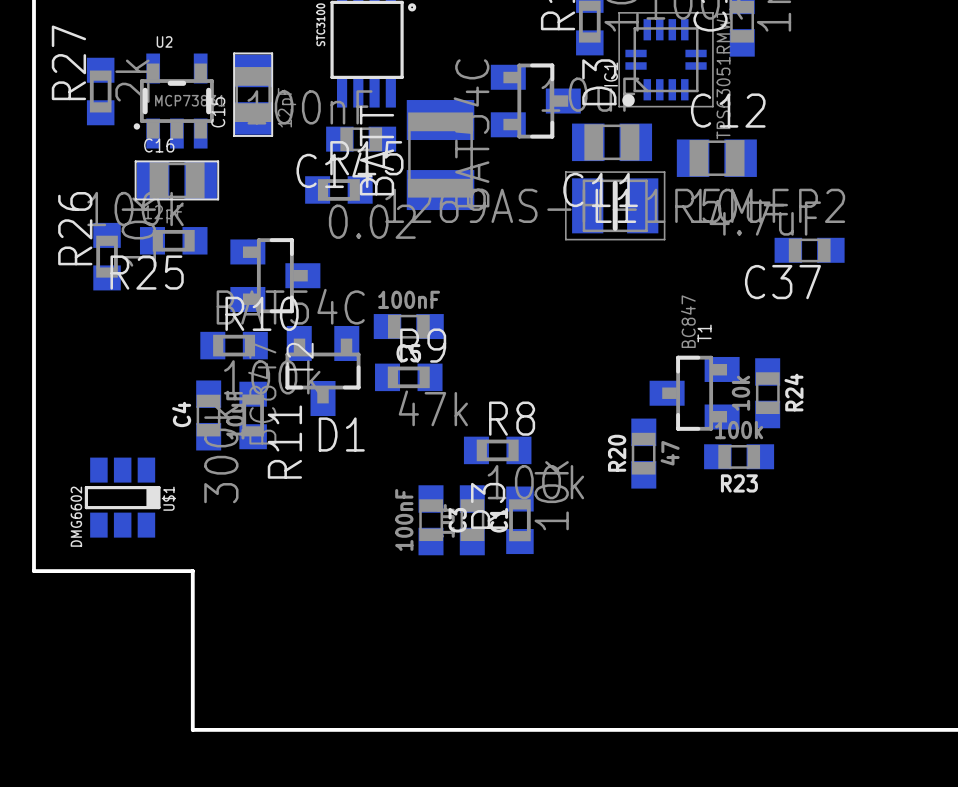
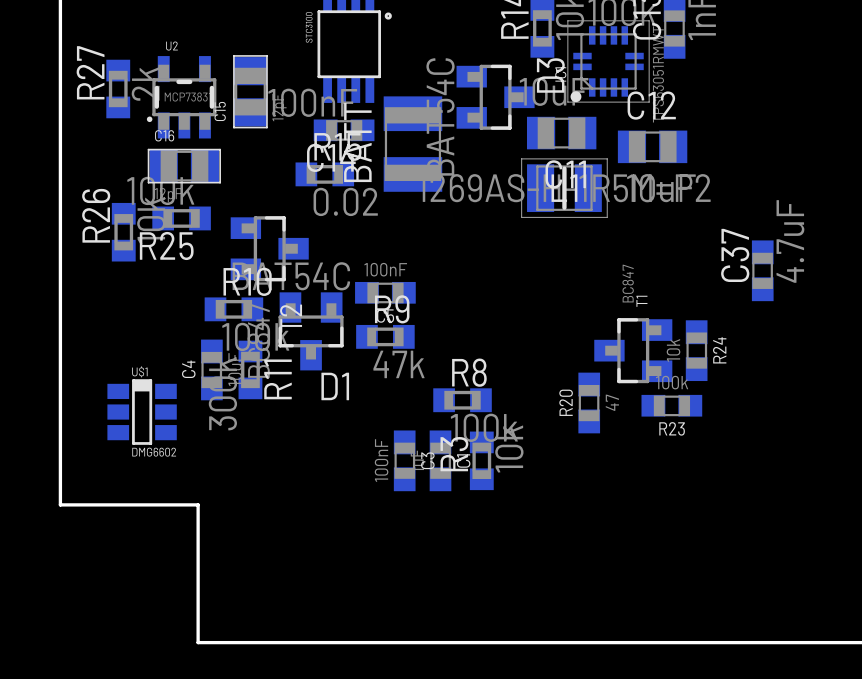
C37 rotation: 0° (809, 250) -> 90° clockwise (762, 270)
C37 position: (809, 250) -> (762, 270)
U$1 rotation: 0° (122, 497) -> 90° counterclockwise (142, 412)

